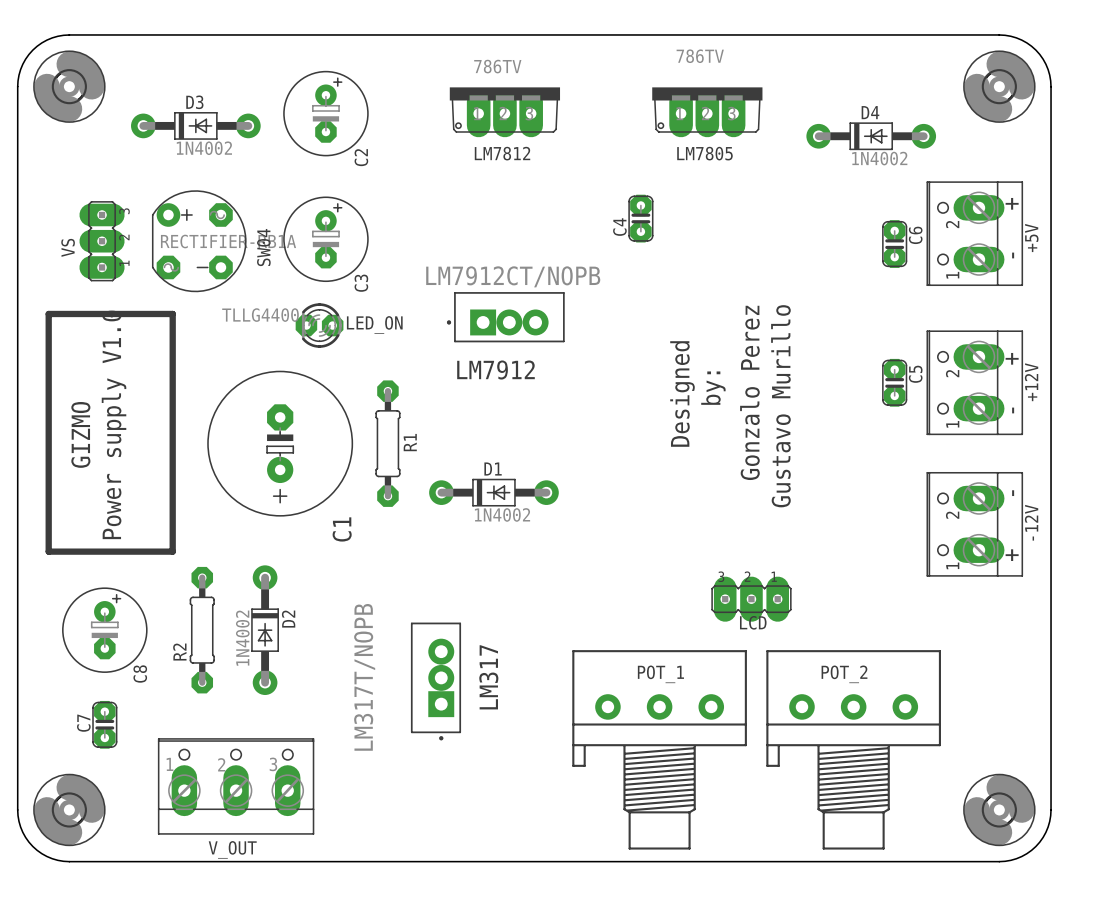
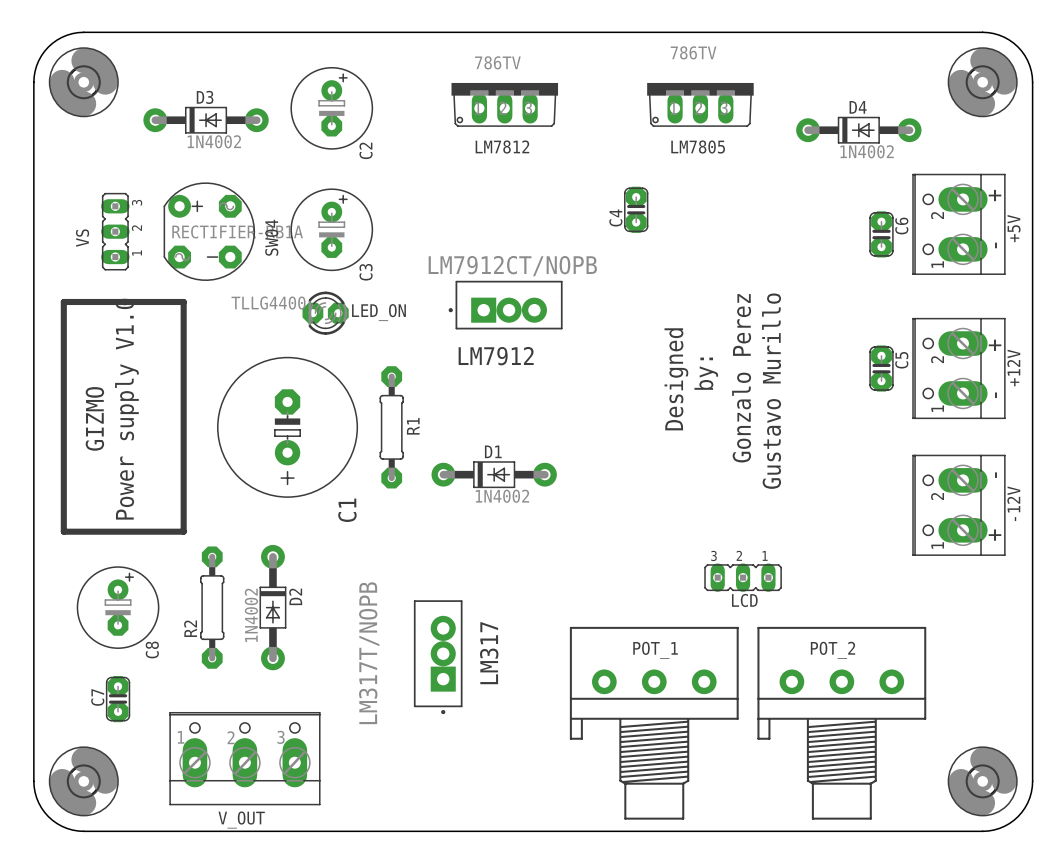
LM7812 footprint: [449, 87, 561, 138] -> [451, 82, 559, 127]
LM7805 footprint: [652, 87, 763, 138] -> [647, 82, 754, 127]
VS footprint: [79, 201, 125, 282] -> [101, 192, 130, 271]
LCD footprint: [711, 576, 792, 622] -> [704, 563, 782, 592]

